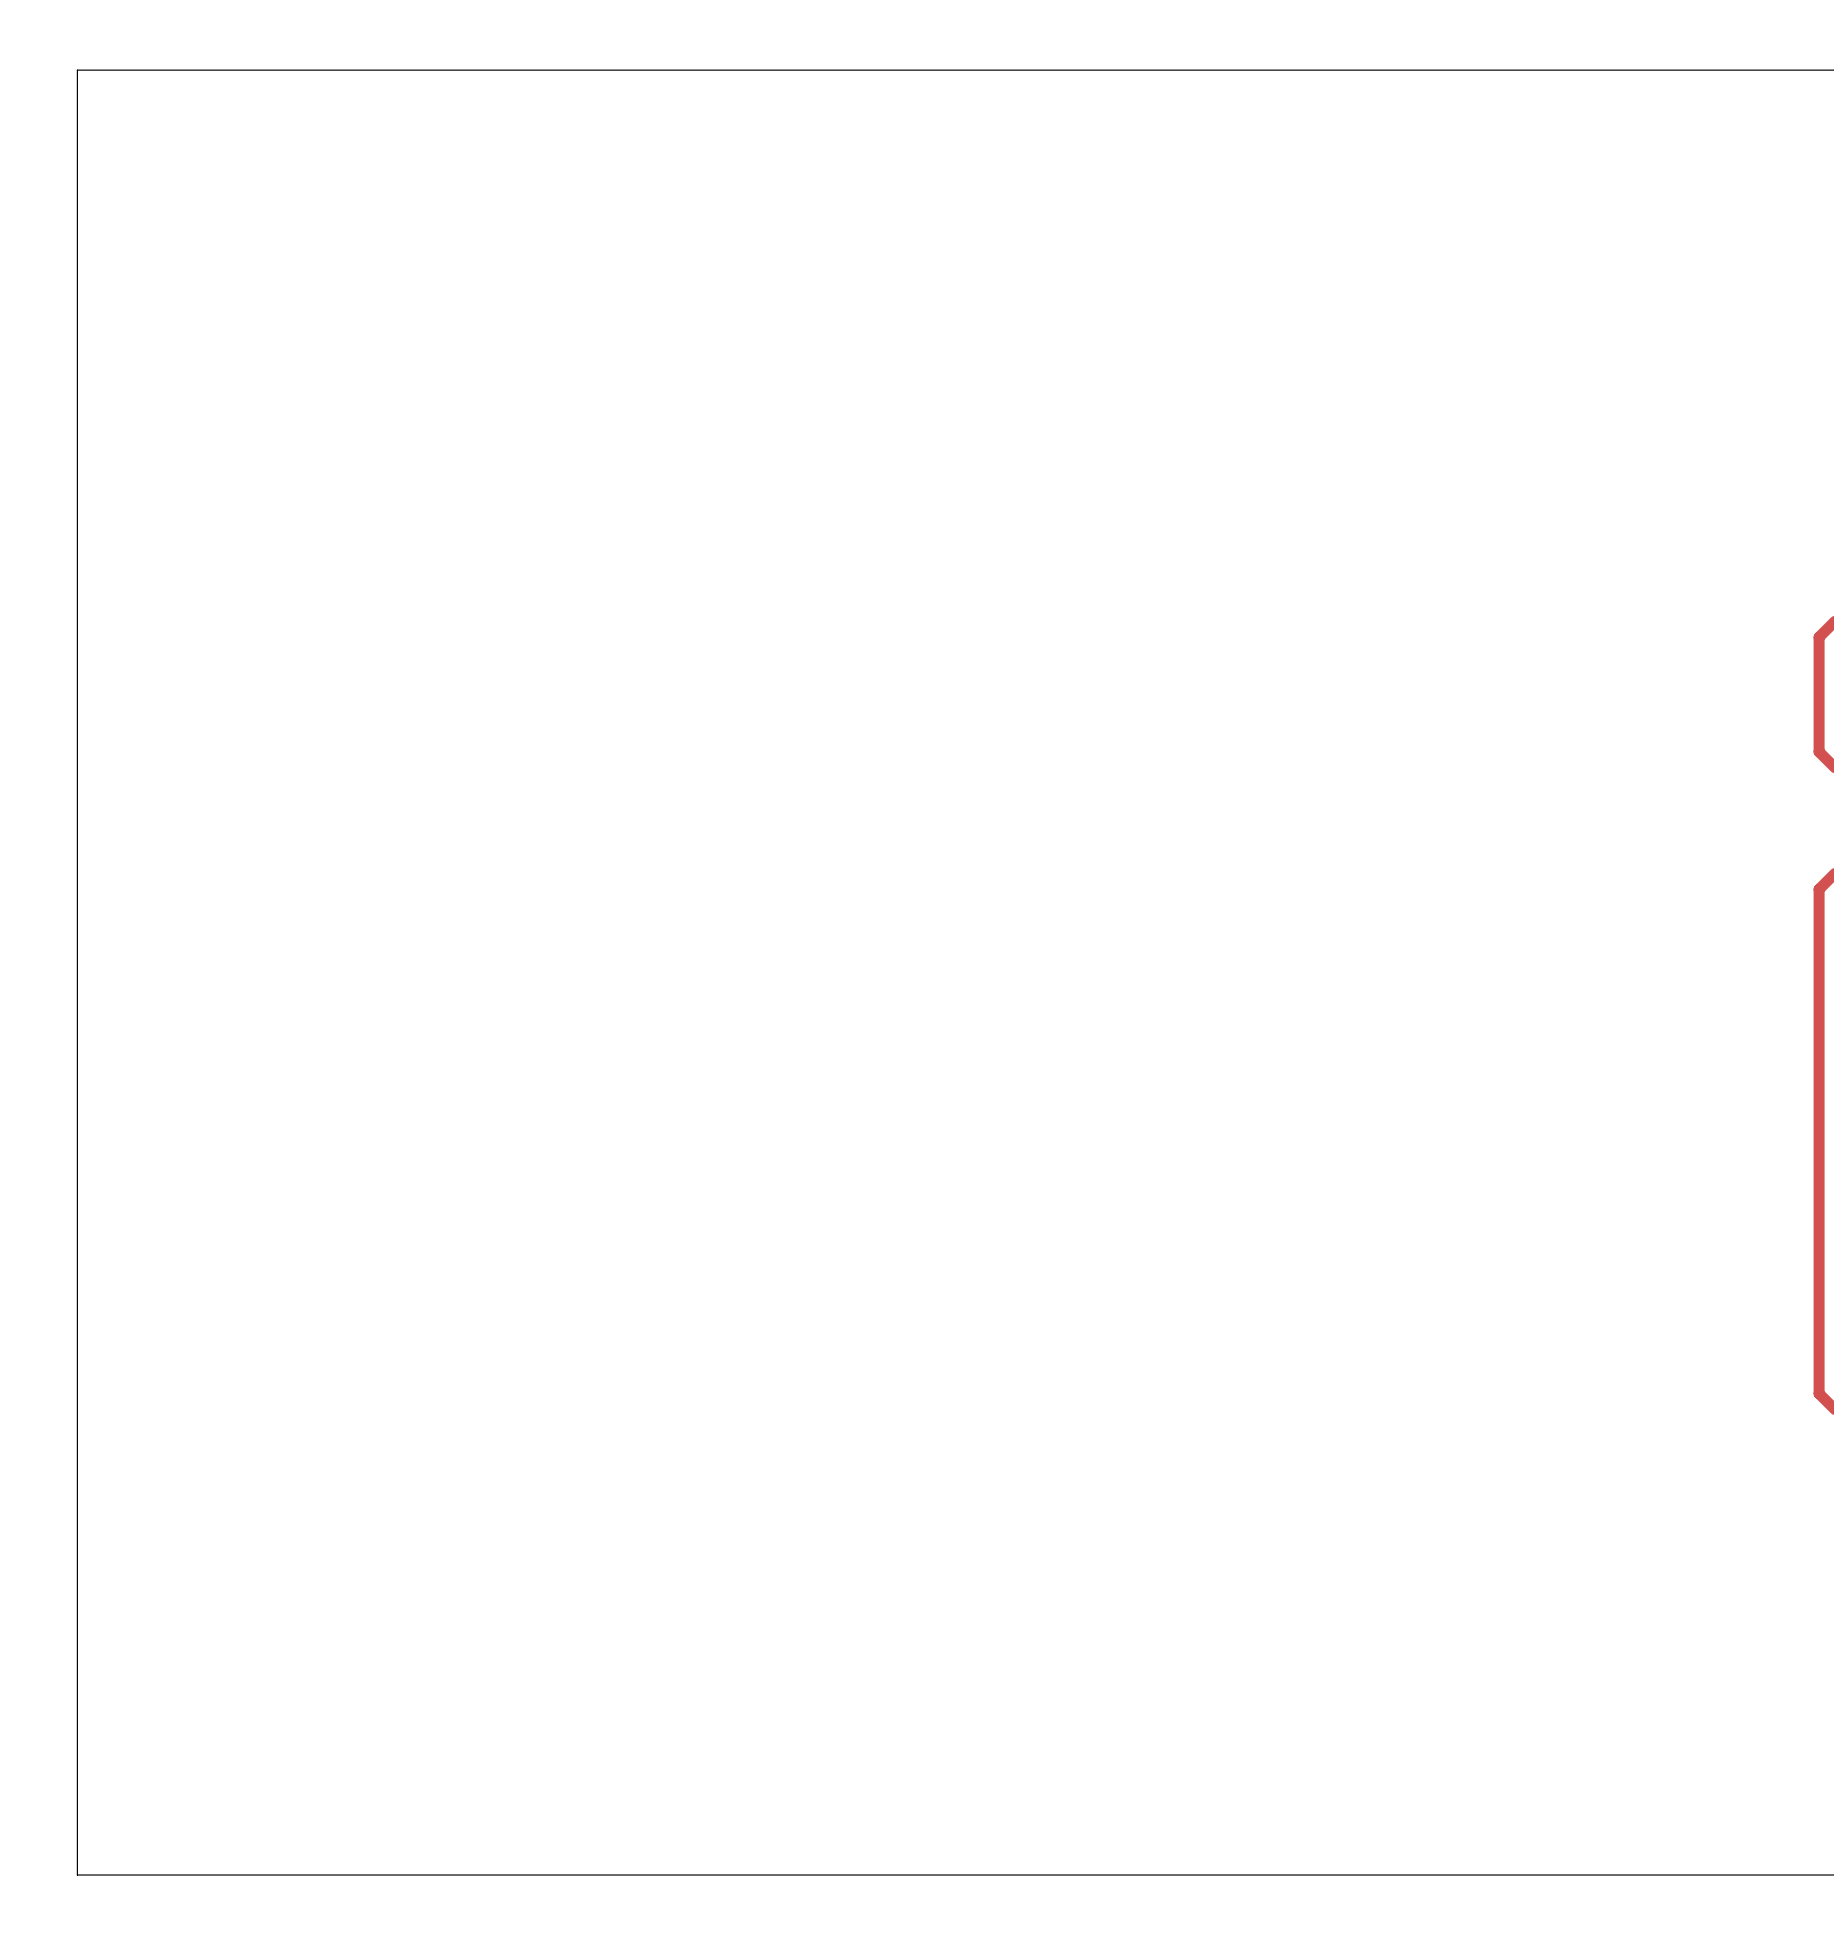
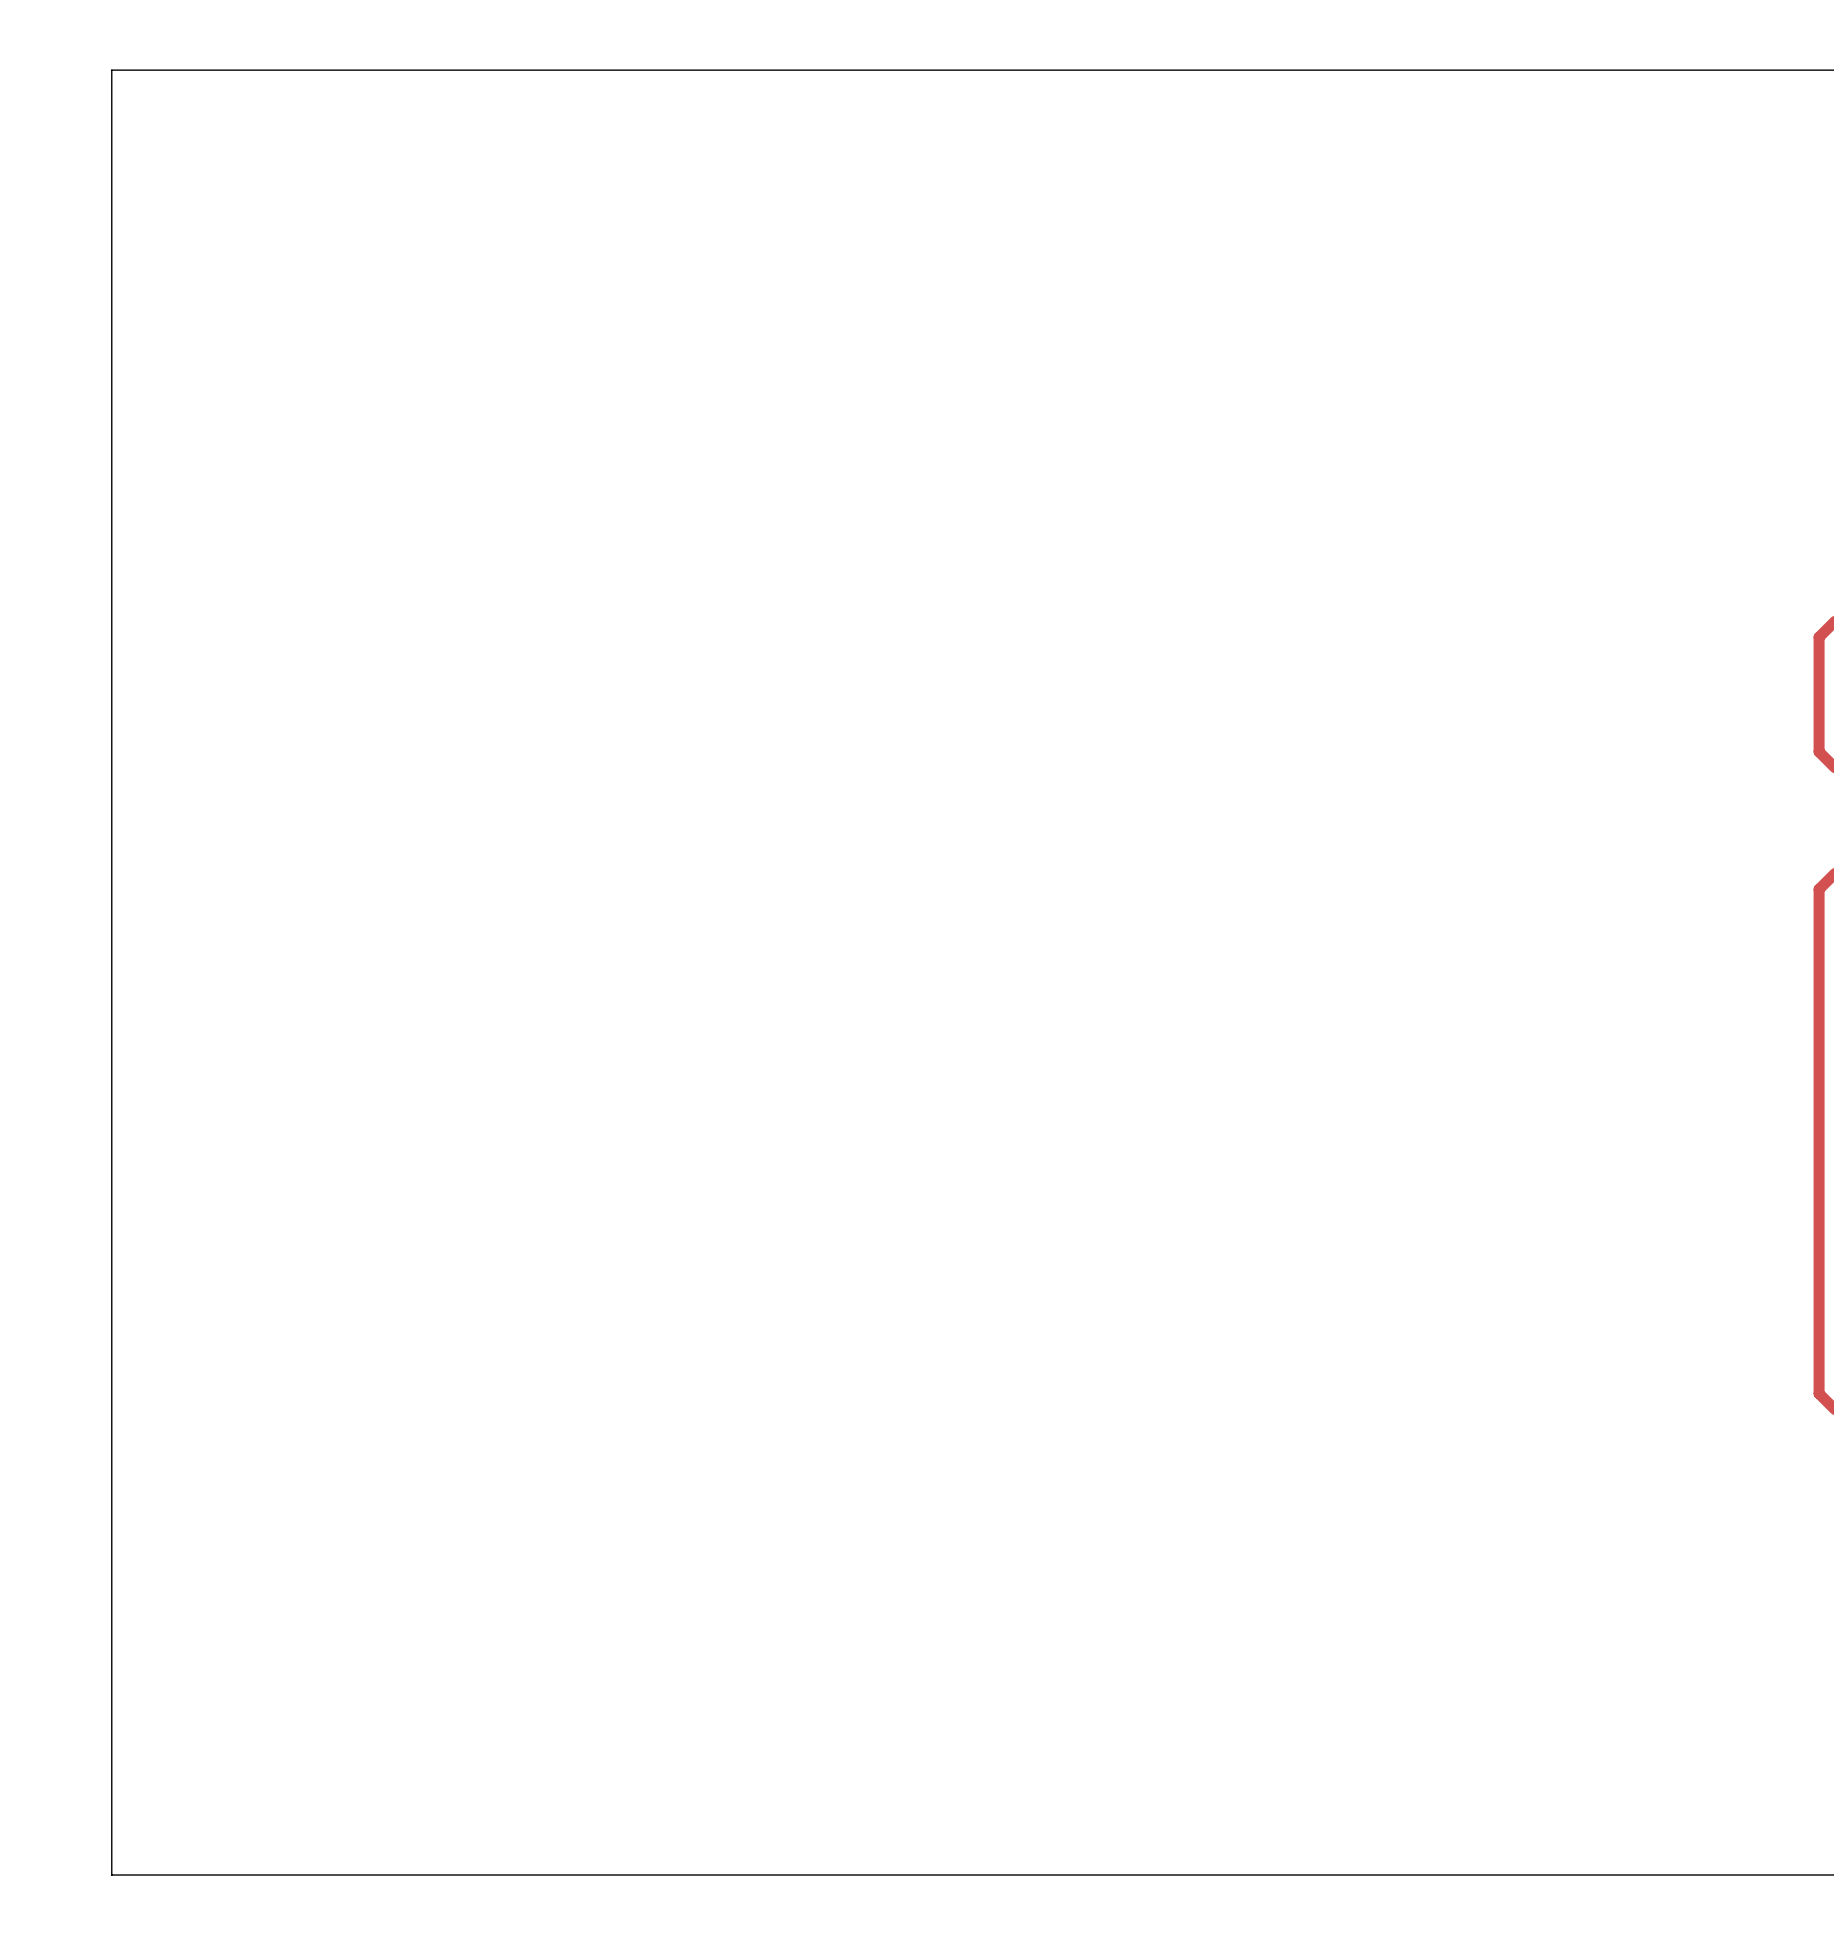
board edge: (111, 70) (77, 70) (77, 1875) (111, 1875) -> (111, 70) (111, 1875)

